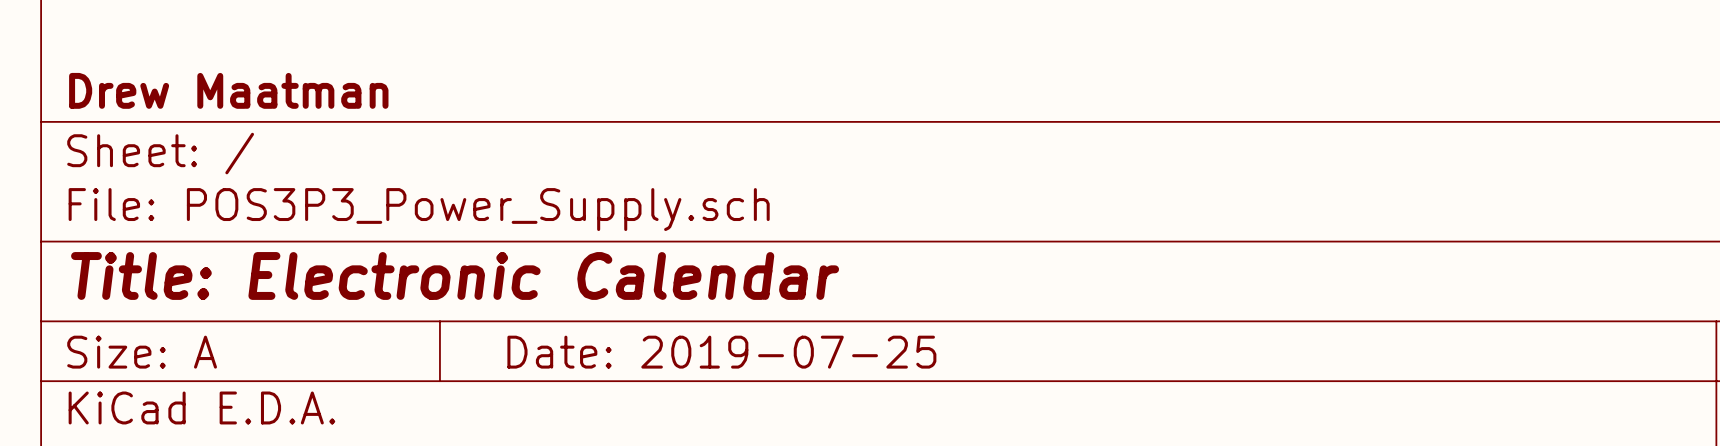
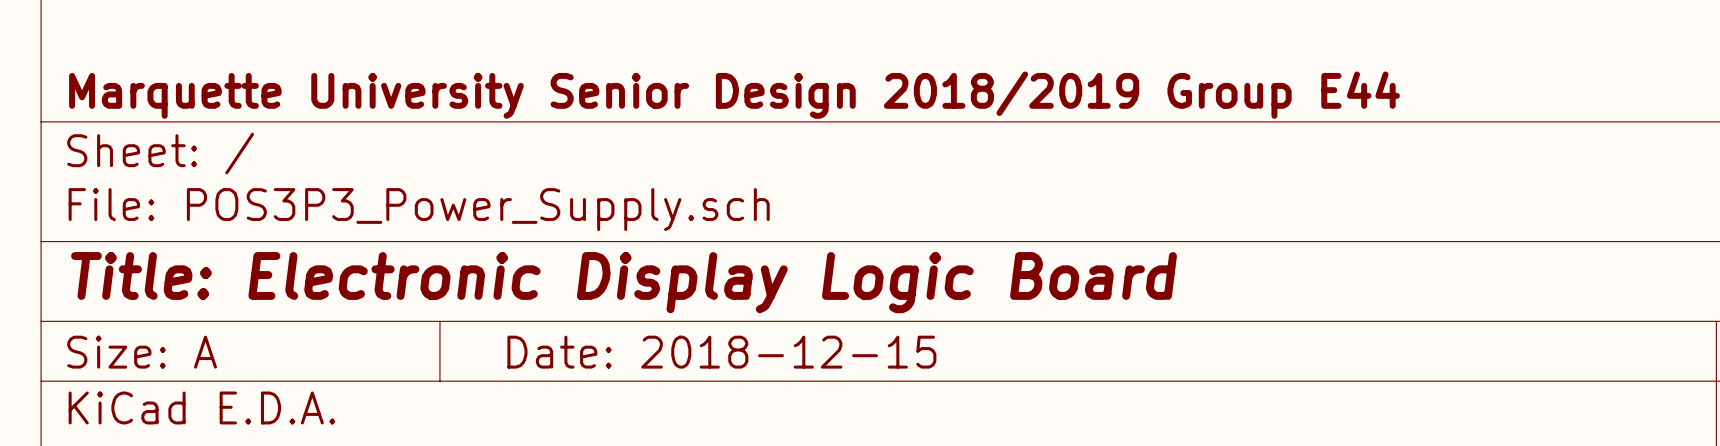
title block: Drew Maatman (228, 90) -> Marquette University Senior Design 2018/2019 Group E44 (734, 95)
title block: Title: Electronic Calendar (455, 275) -> Title: Electronic Display Logic Board (623, 282)
title block: Date: 2019-07-25 (721, 352) -> Date: 2018-12-15 (721, 352)

